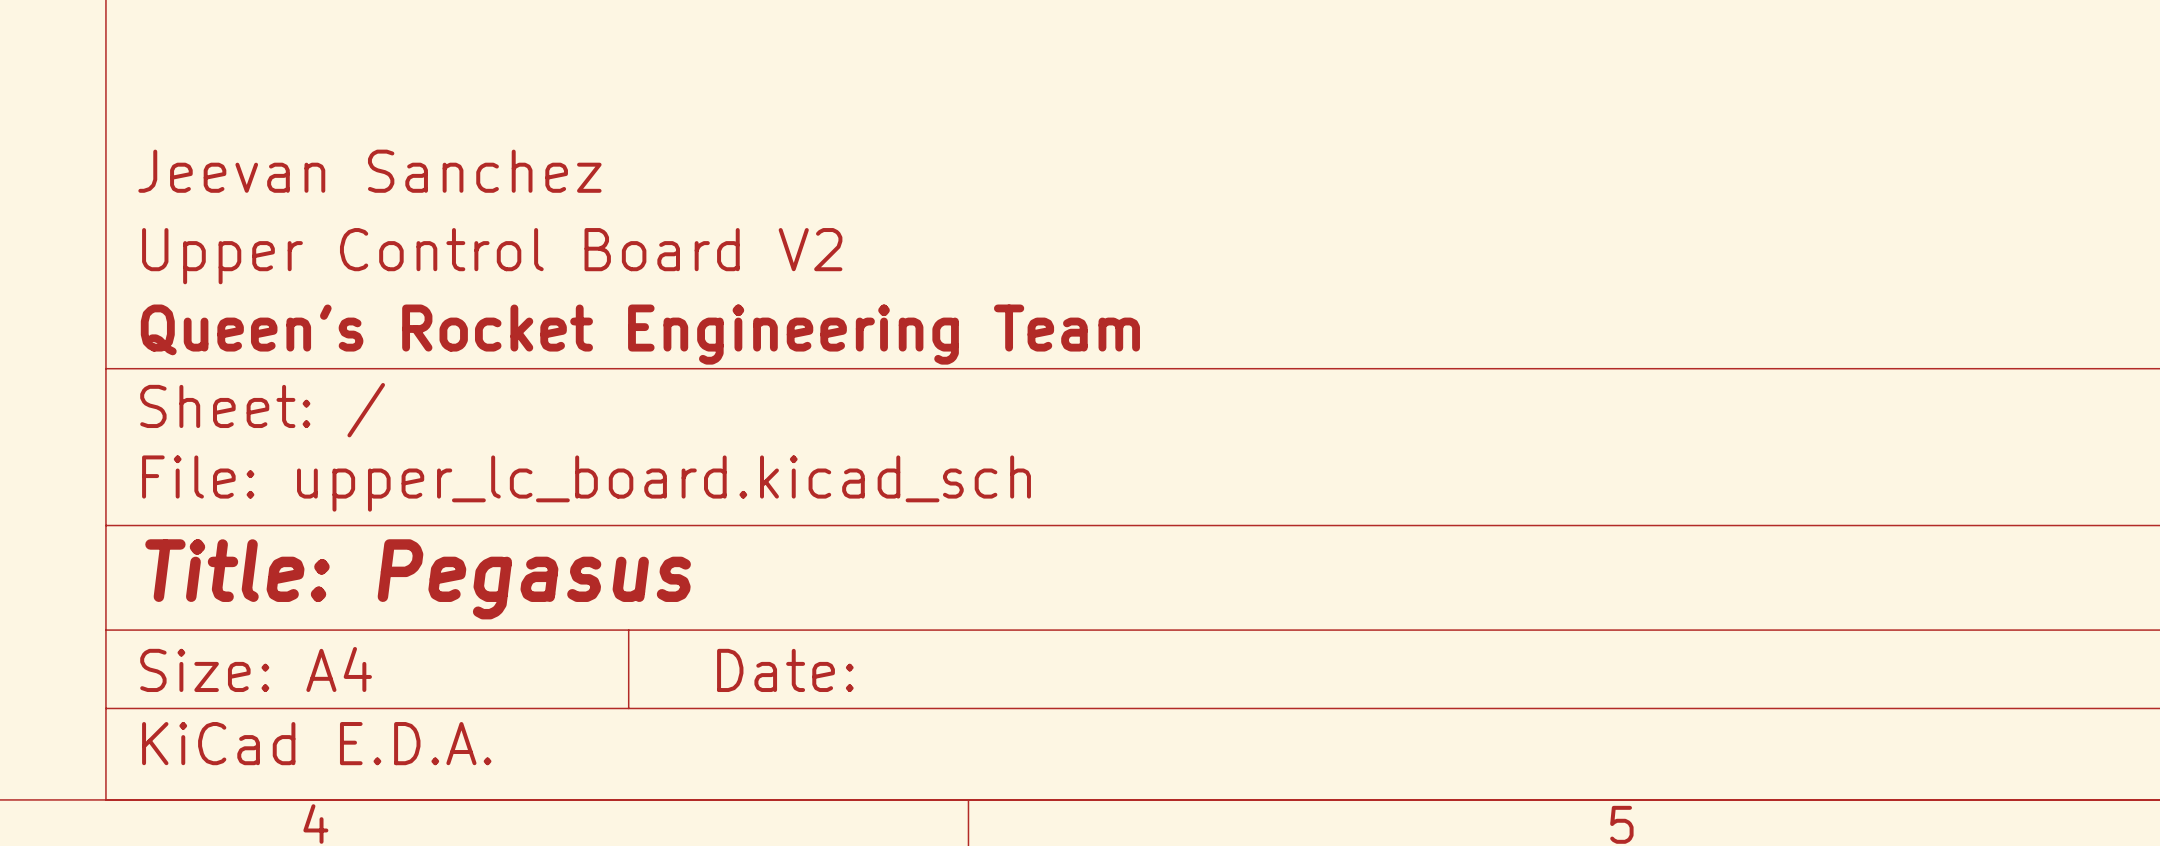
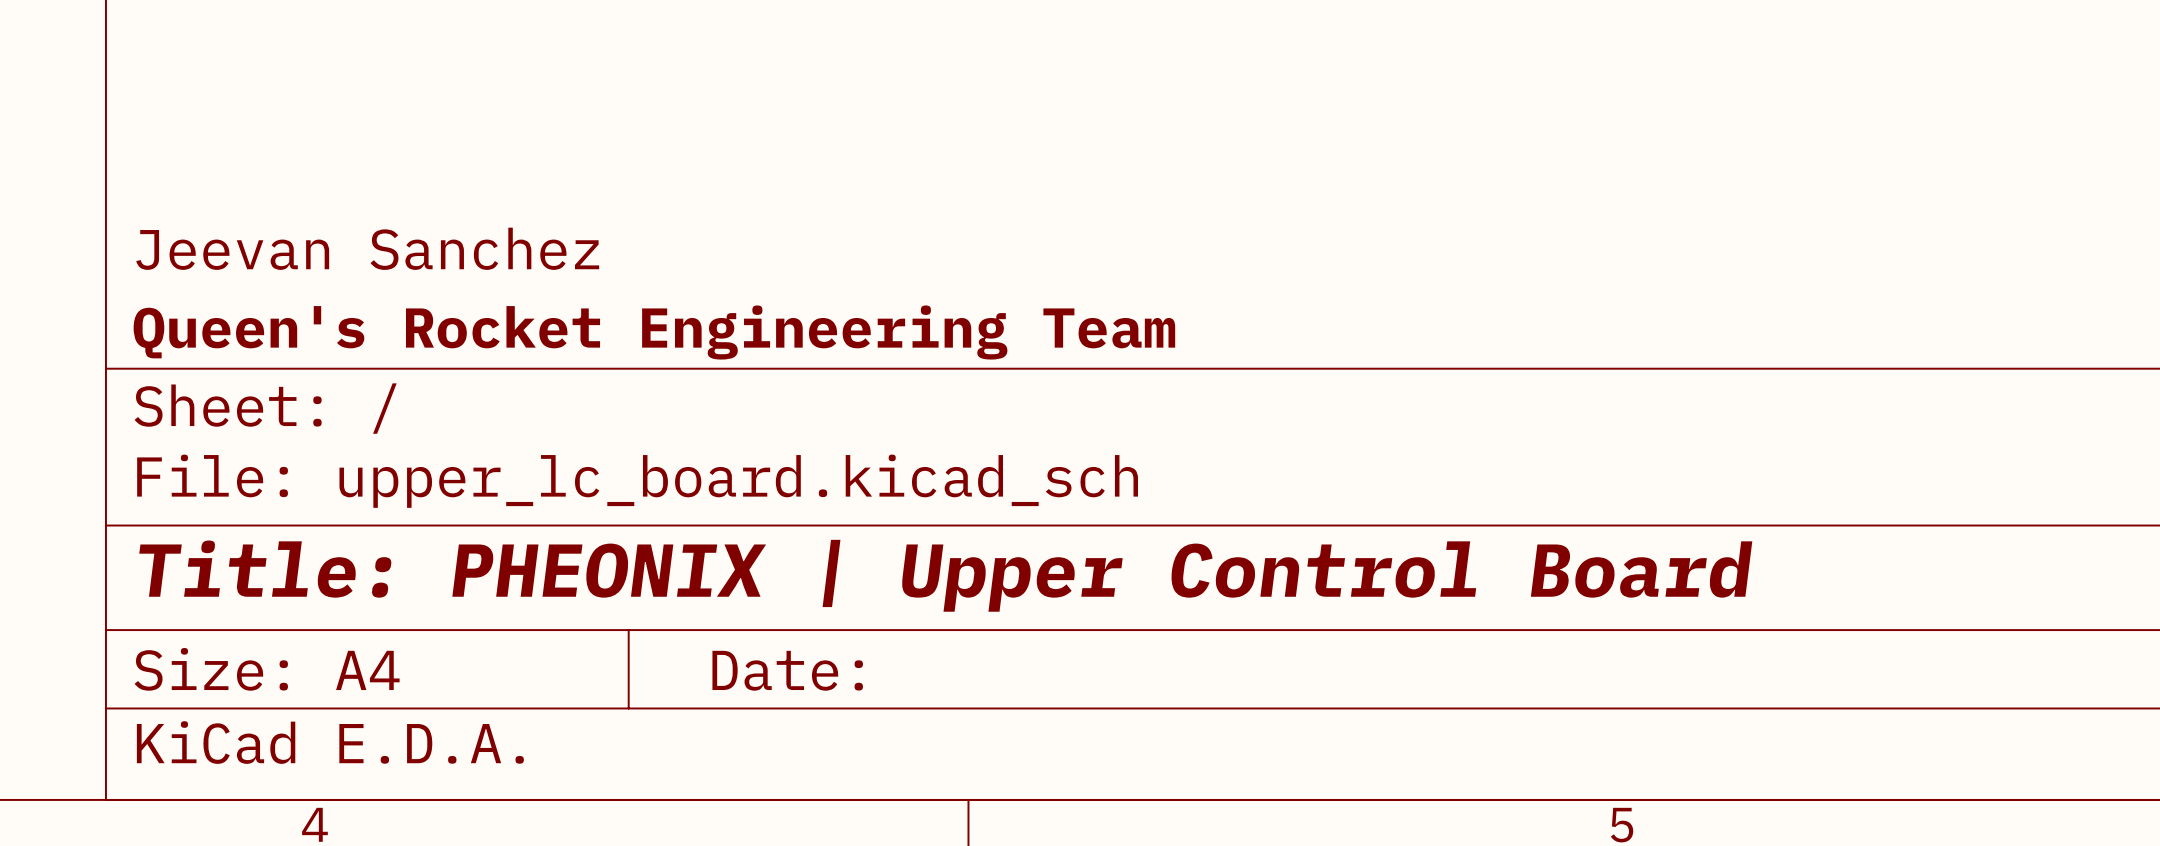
title block: Jeevan Sanchez (369, 171) -> none
title block: Upper Control Board V2 (492, 256) -> Jeevan Sanchez (367, 248)
title block: Title: Pegasus (418, 579) -> Title: PHEONIX | Upper Control Board (945, 575)

